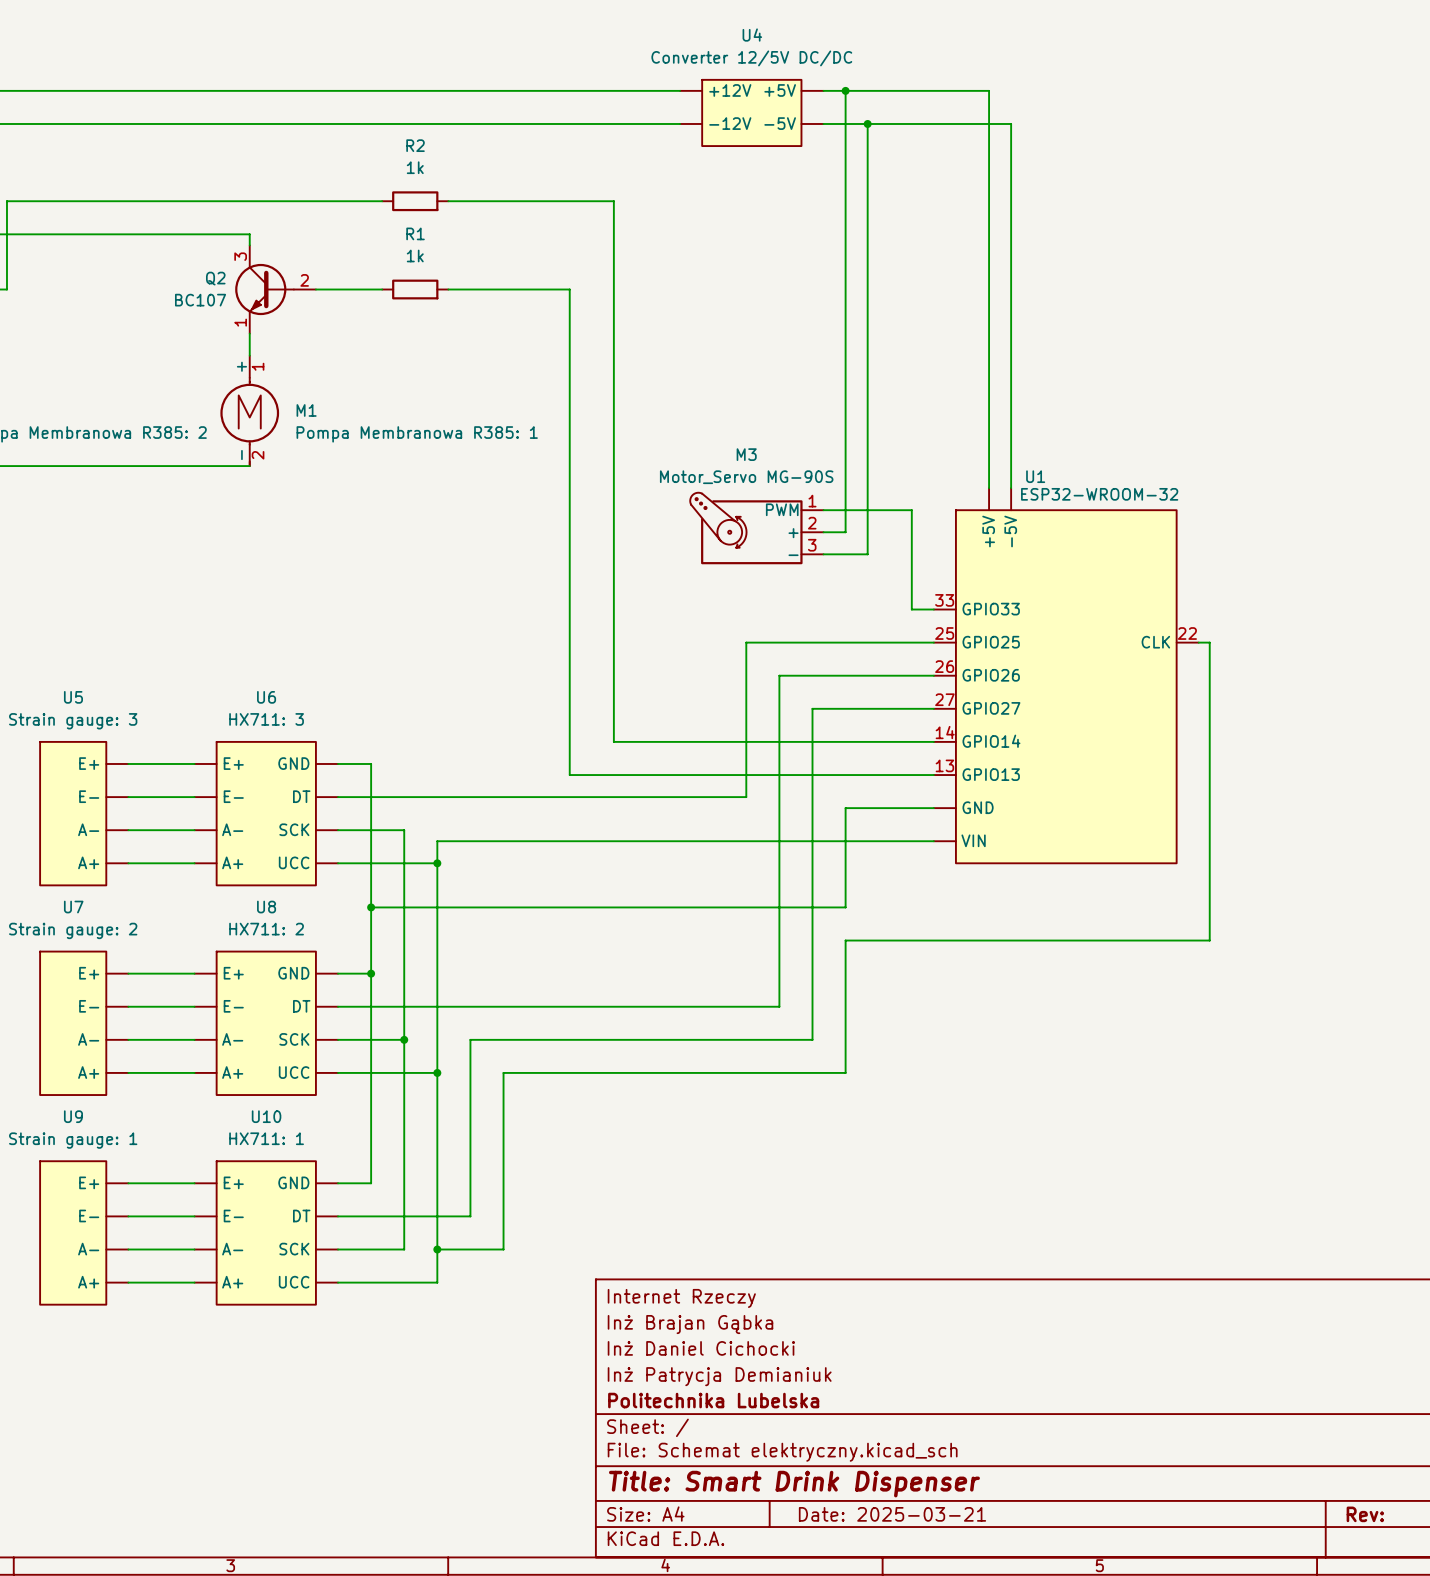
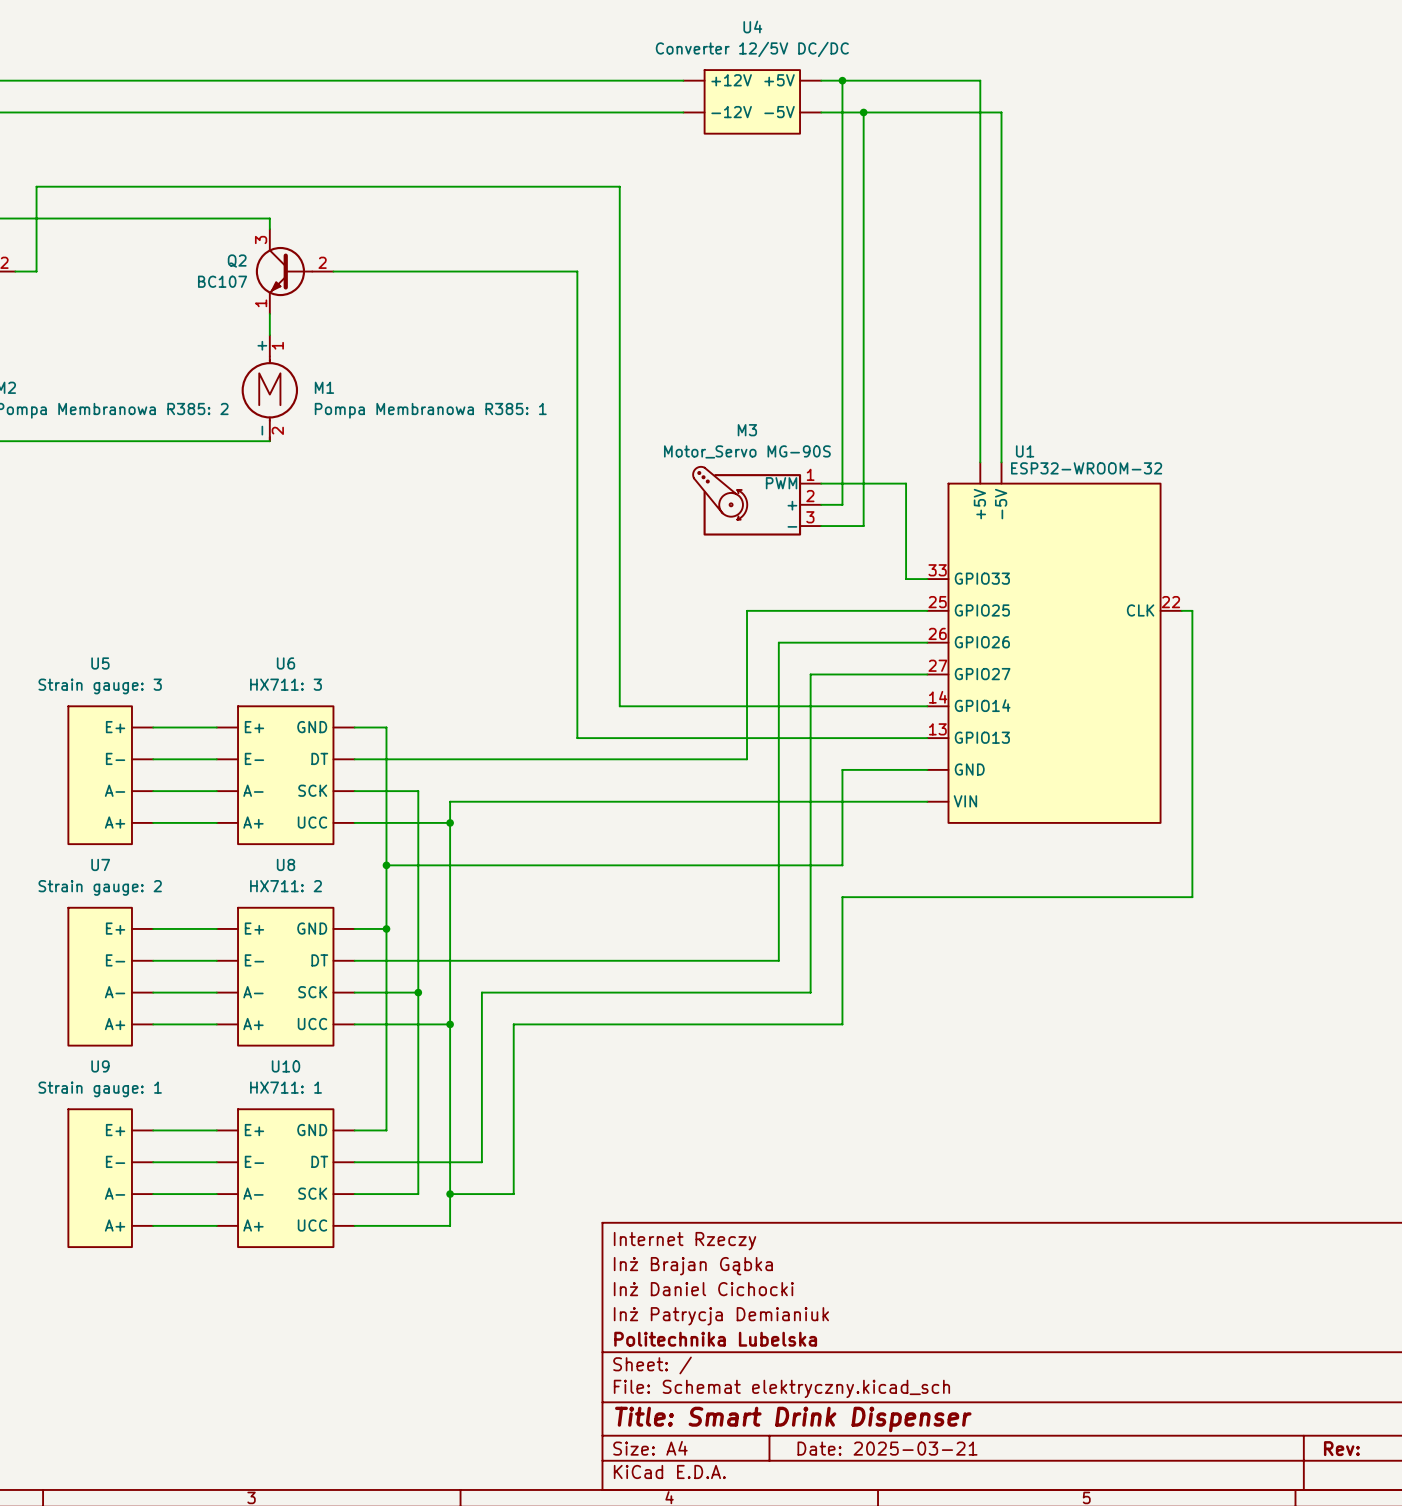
wire: none -> (397, 186) (460, 186)
R2: 1k (415, 201) -> none
wire: none -> (397, 271) (460, 271)
R1: 1k (415, 289) -> none

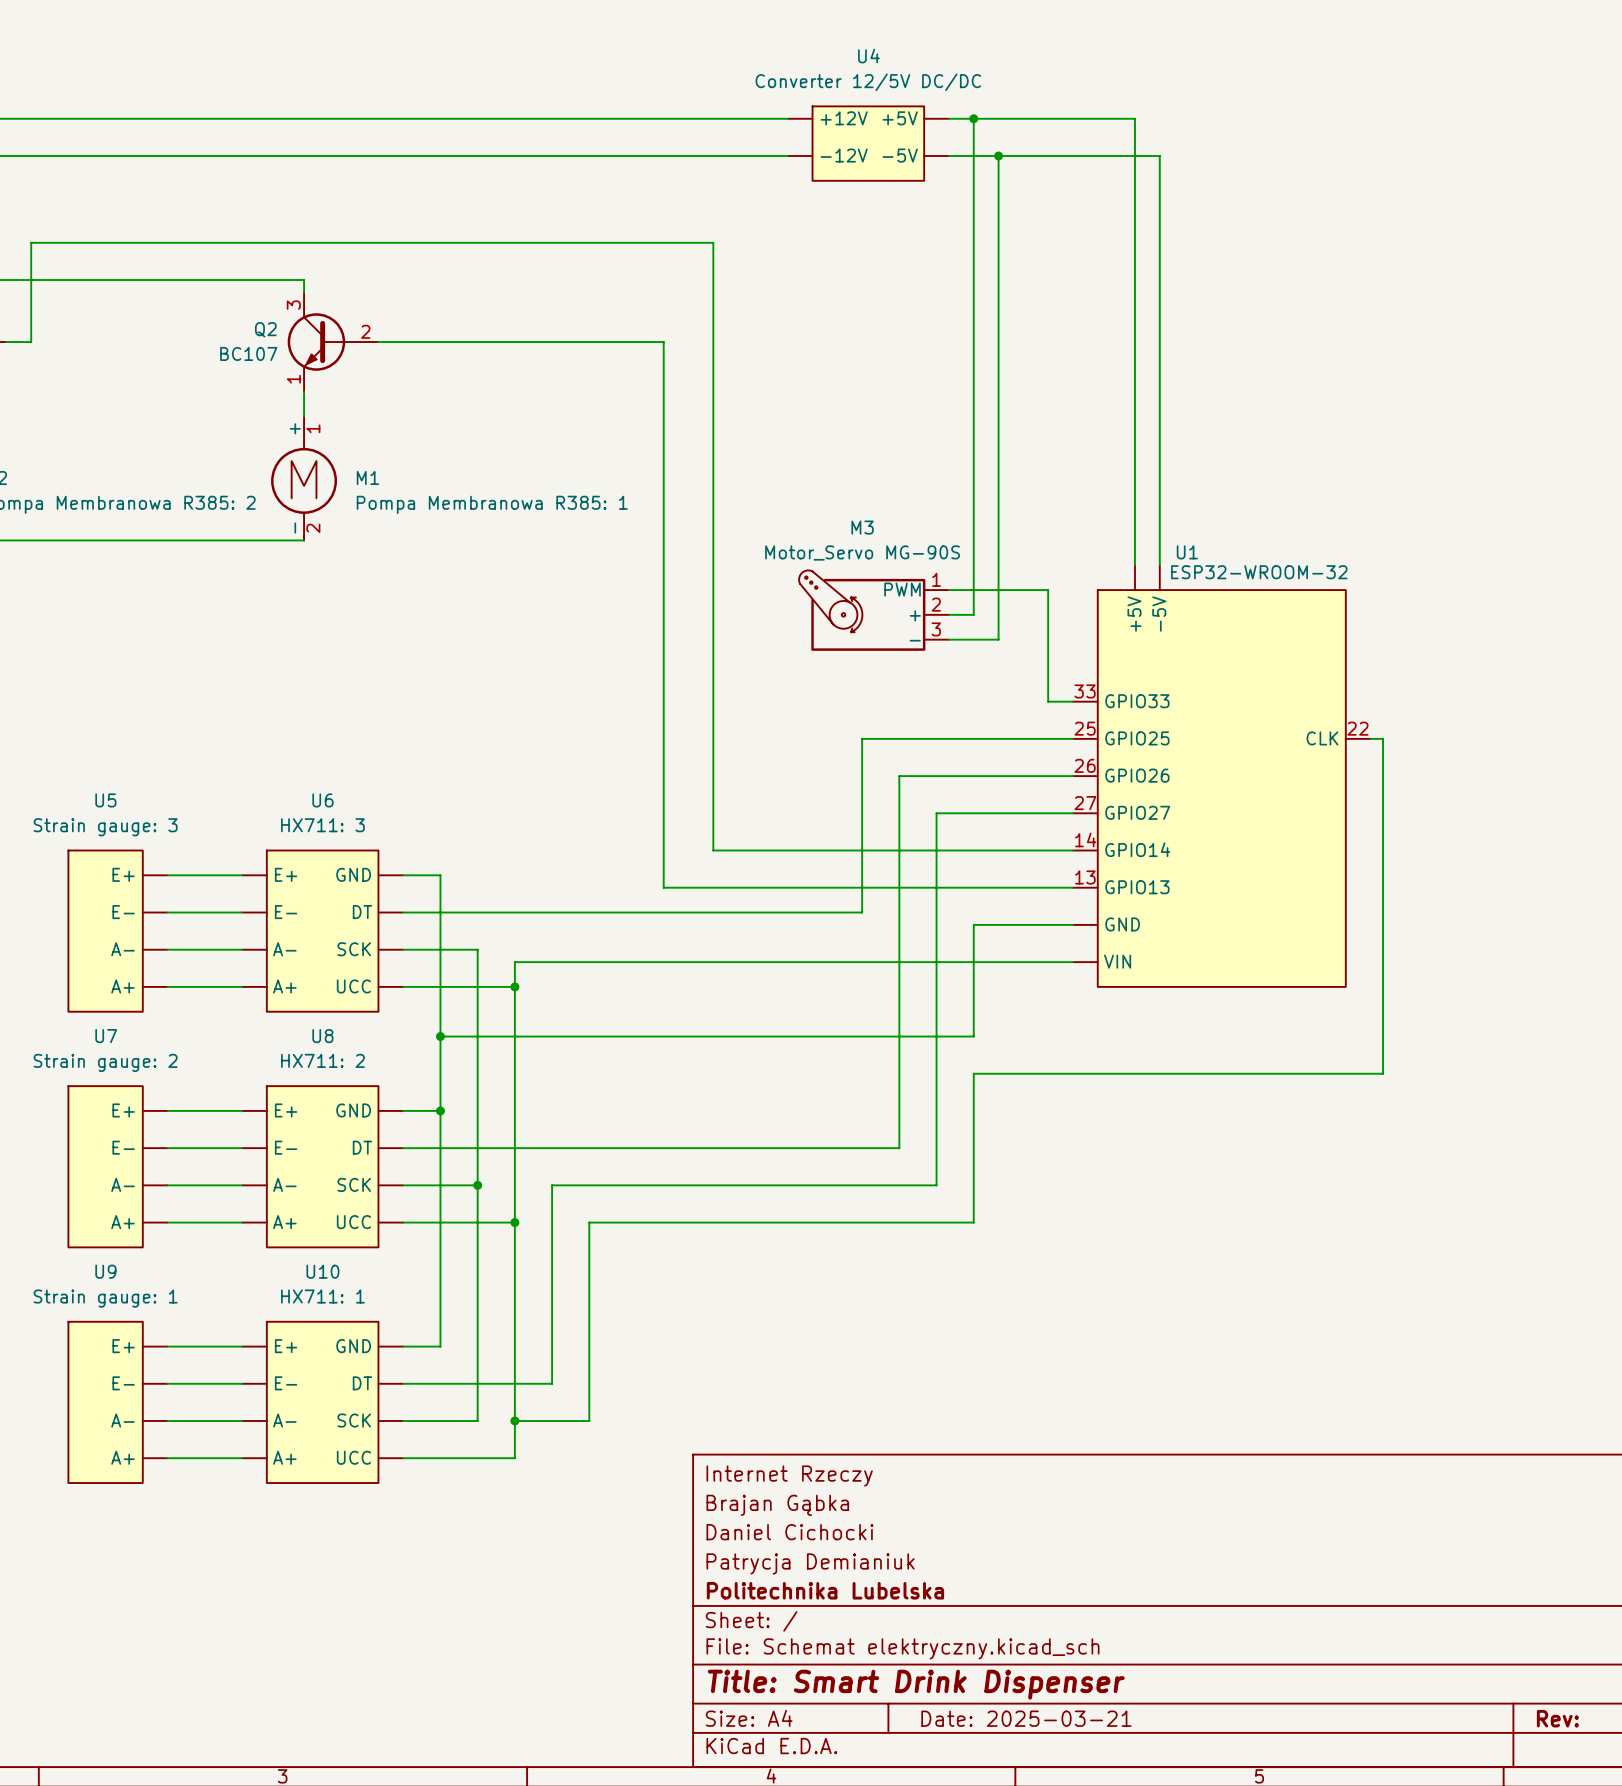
title block: Inż Brajan Gąbka (693, 1266) -> Brajan Gąbka (777, 1505)
title block: Inż Daniel Cichocki (703, 1289) -> Daniel Cichocki (789, 1532)
title block: Inż Patrycja Demianiuk (721, 1316) -> Patrycja Demianiuk (810, 1563)

